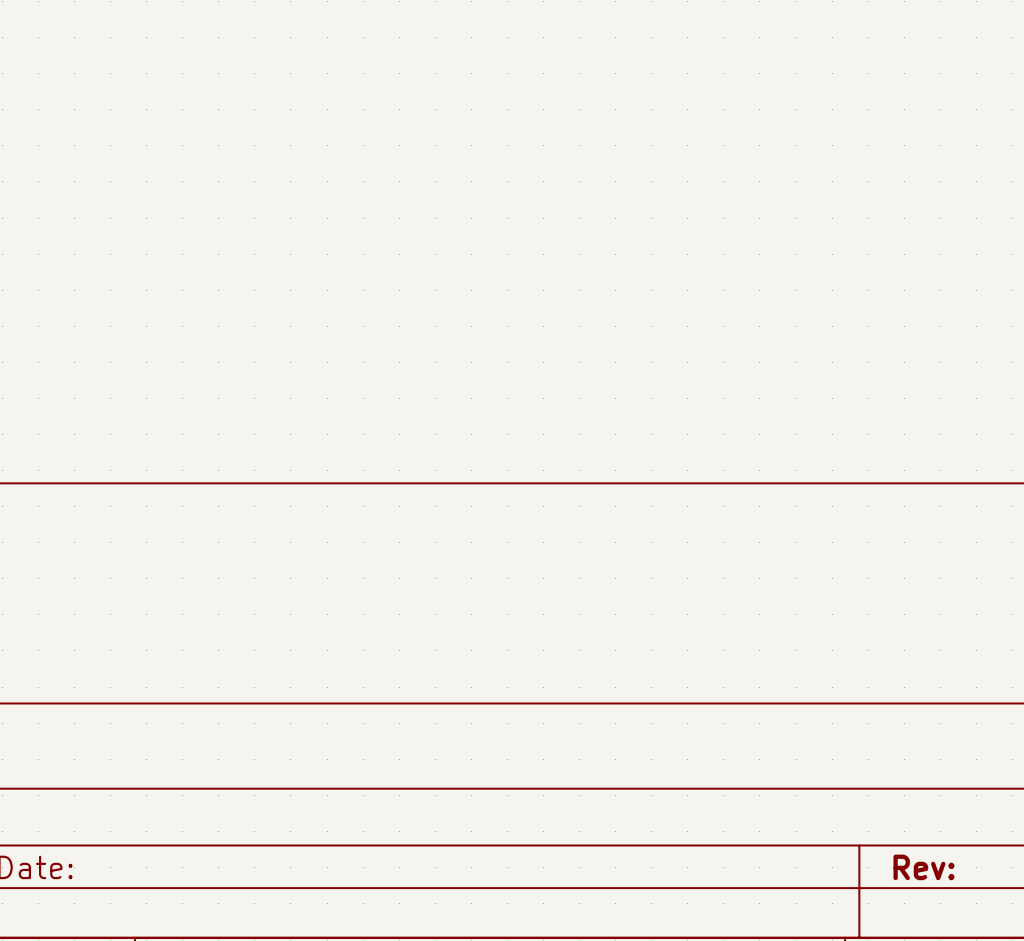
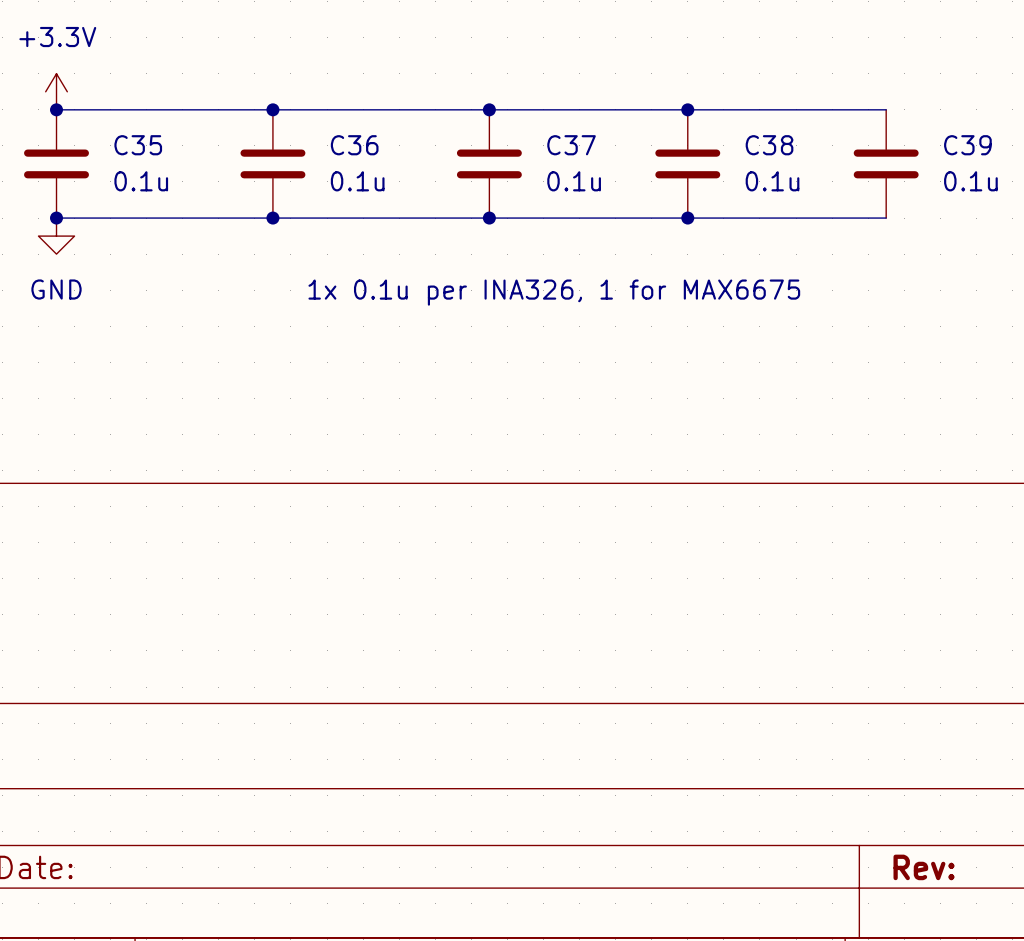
power symbol: none -> +3.3V (56, 91)
wire: none -> (56, 109) (886, 109)
junction: none -> (56, 109)
junction: none -> (272, 109)
junction: none -> (489, 109)
junction: none -> (687, 109)
C35: none -> 0.1u (56, 163)
C36: none -> 0.1u (272, 163)
C37: none -> 0.1u (489, 163)
C38: none -> 0.1u (687, 163)
C39: none -> 0.1u (886, 163)
wire: none -> (56, 218) (886, 218)
junction: none -> (56, 218)
junction: none -> (272, 218)
junction: none -> (489, 218)
junction: none -> (687, 218)
power symbol: none -> GND (56, 236)
text: none -> 1x 0.1u per INA326, 1 for MAX6675 (554, 292)

